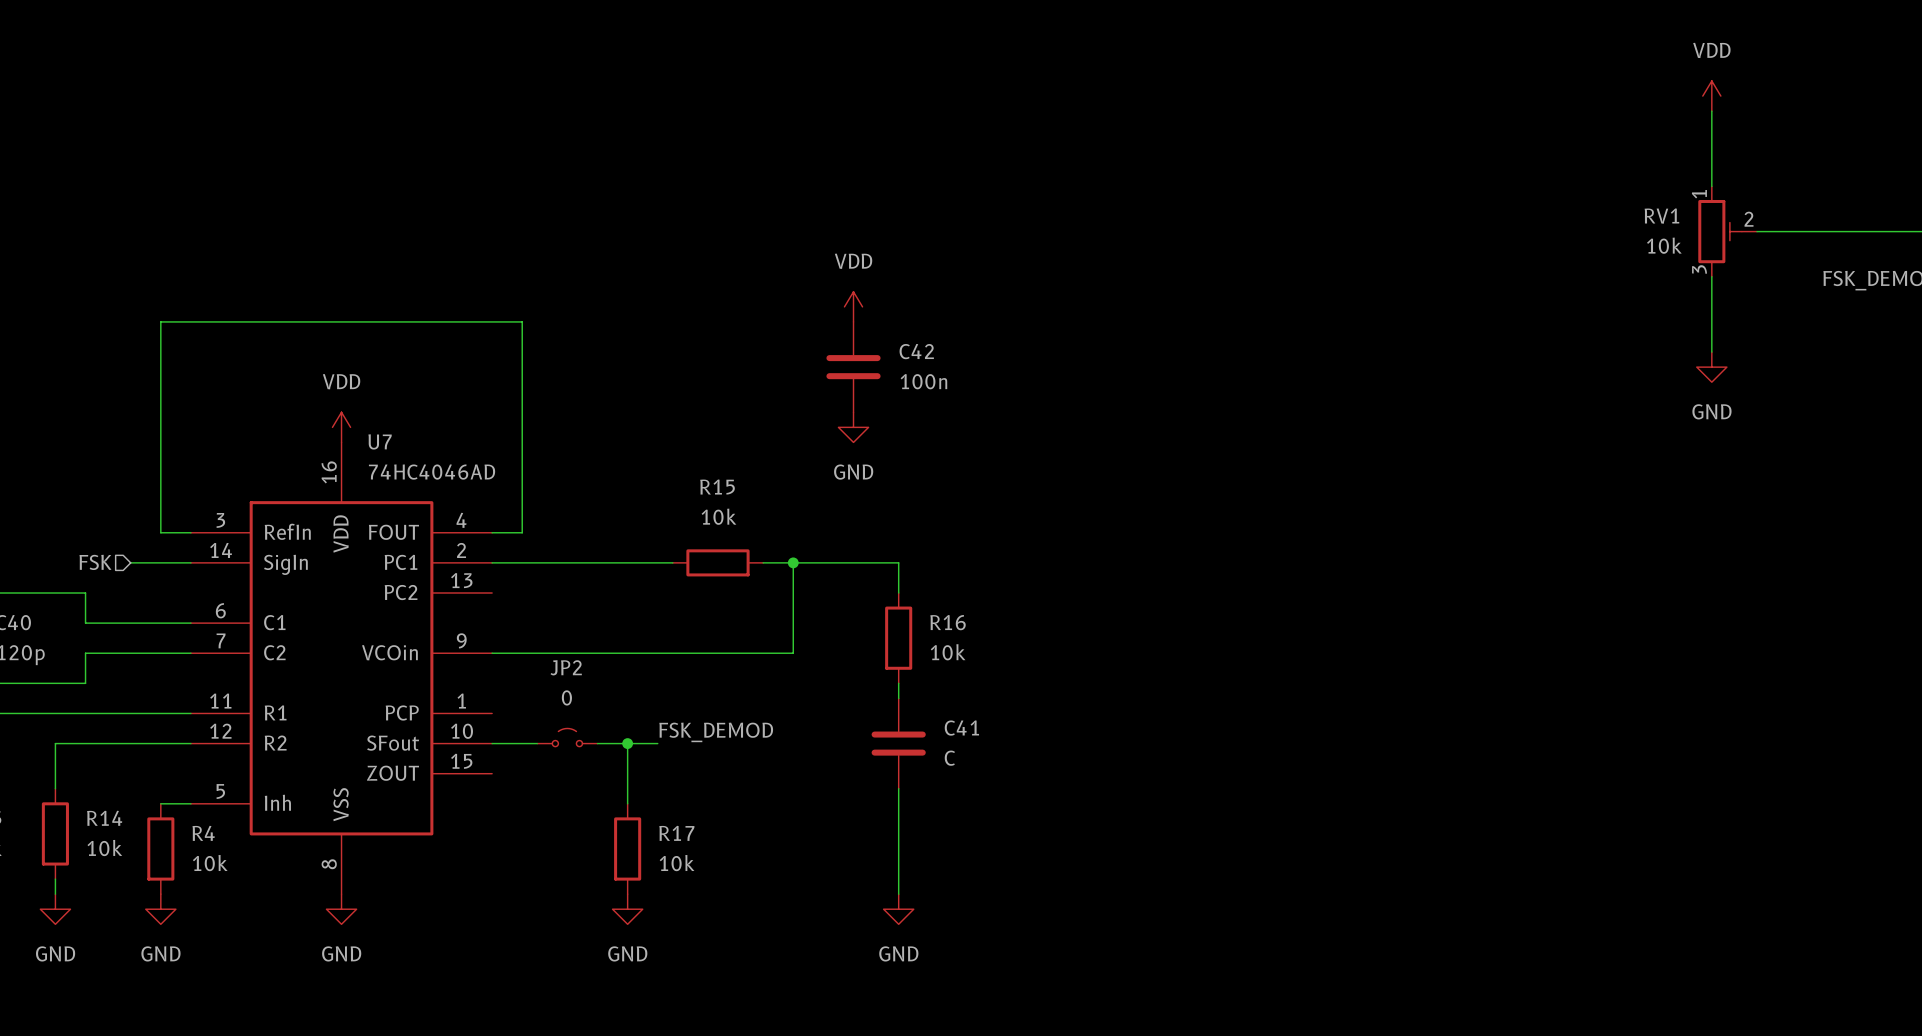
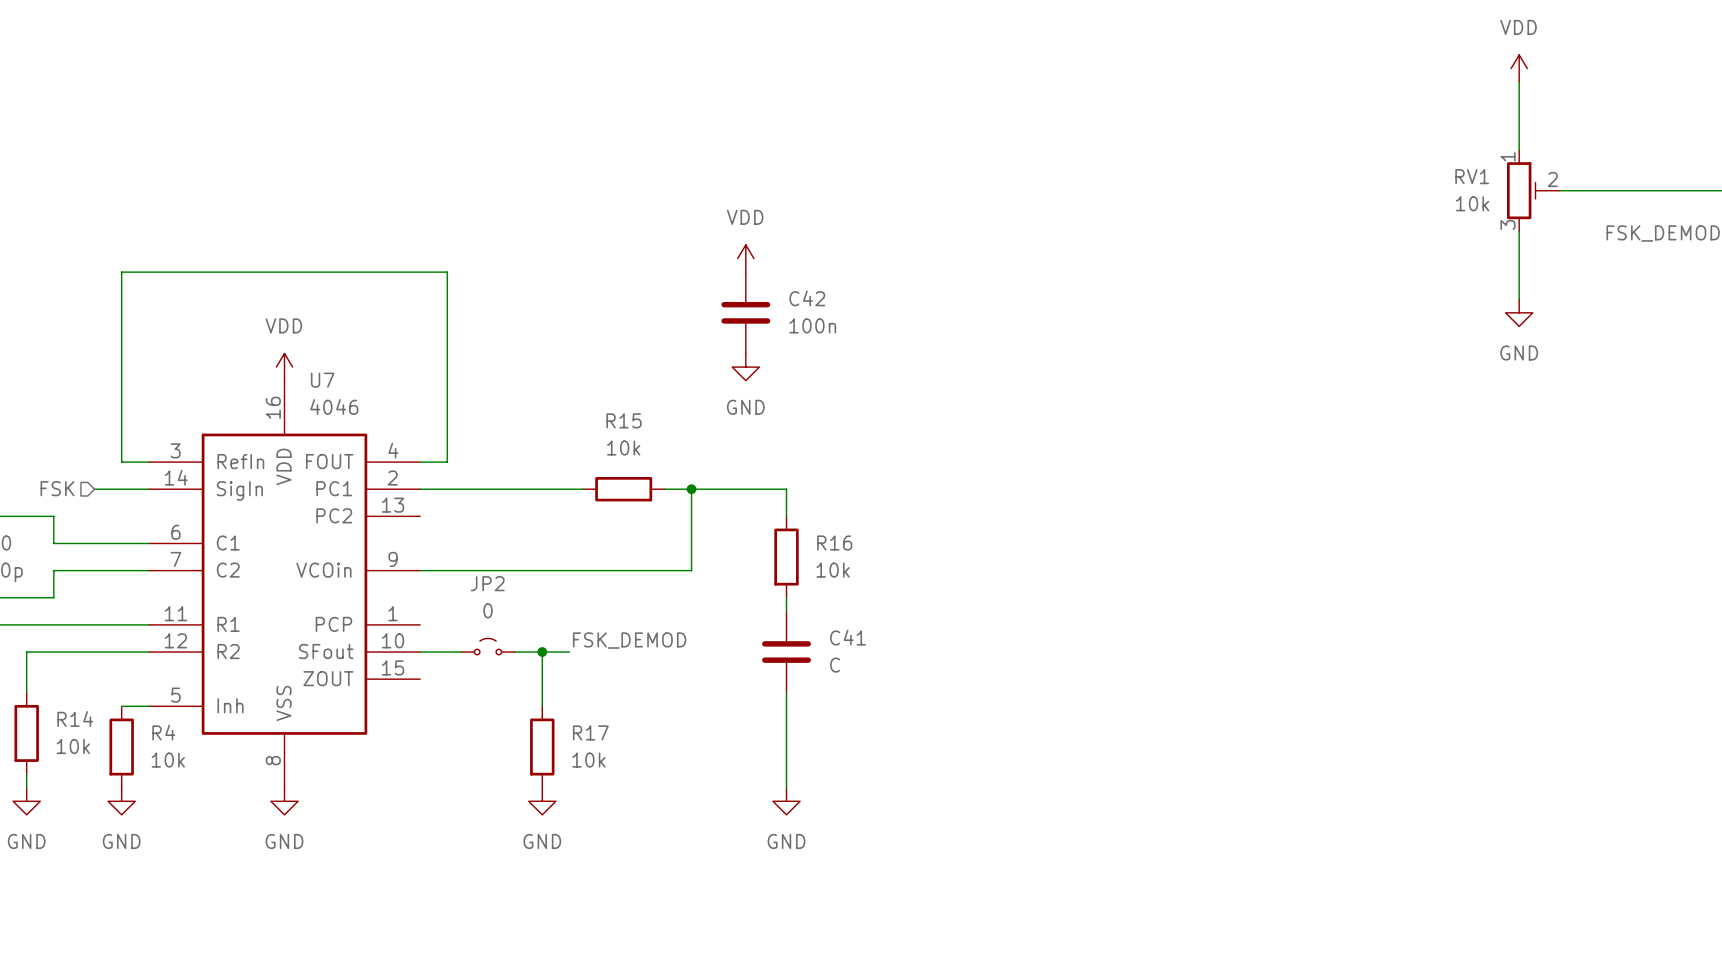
U7 value: 74HC4046AD (432, 472) -> 4046 (334, 406)

